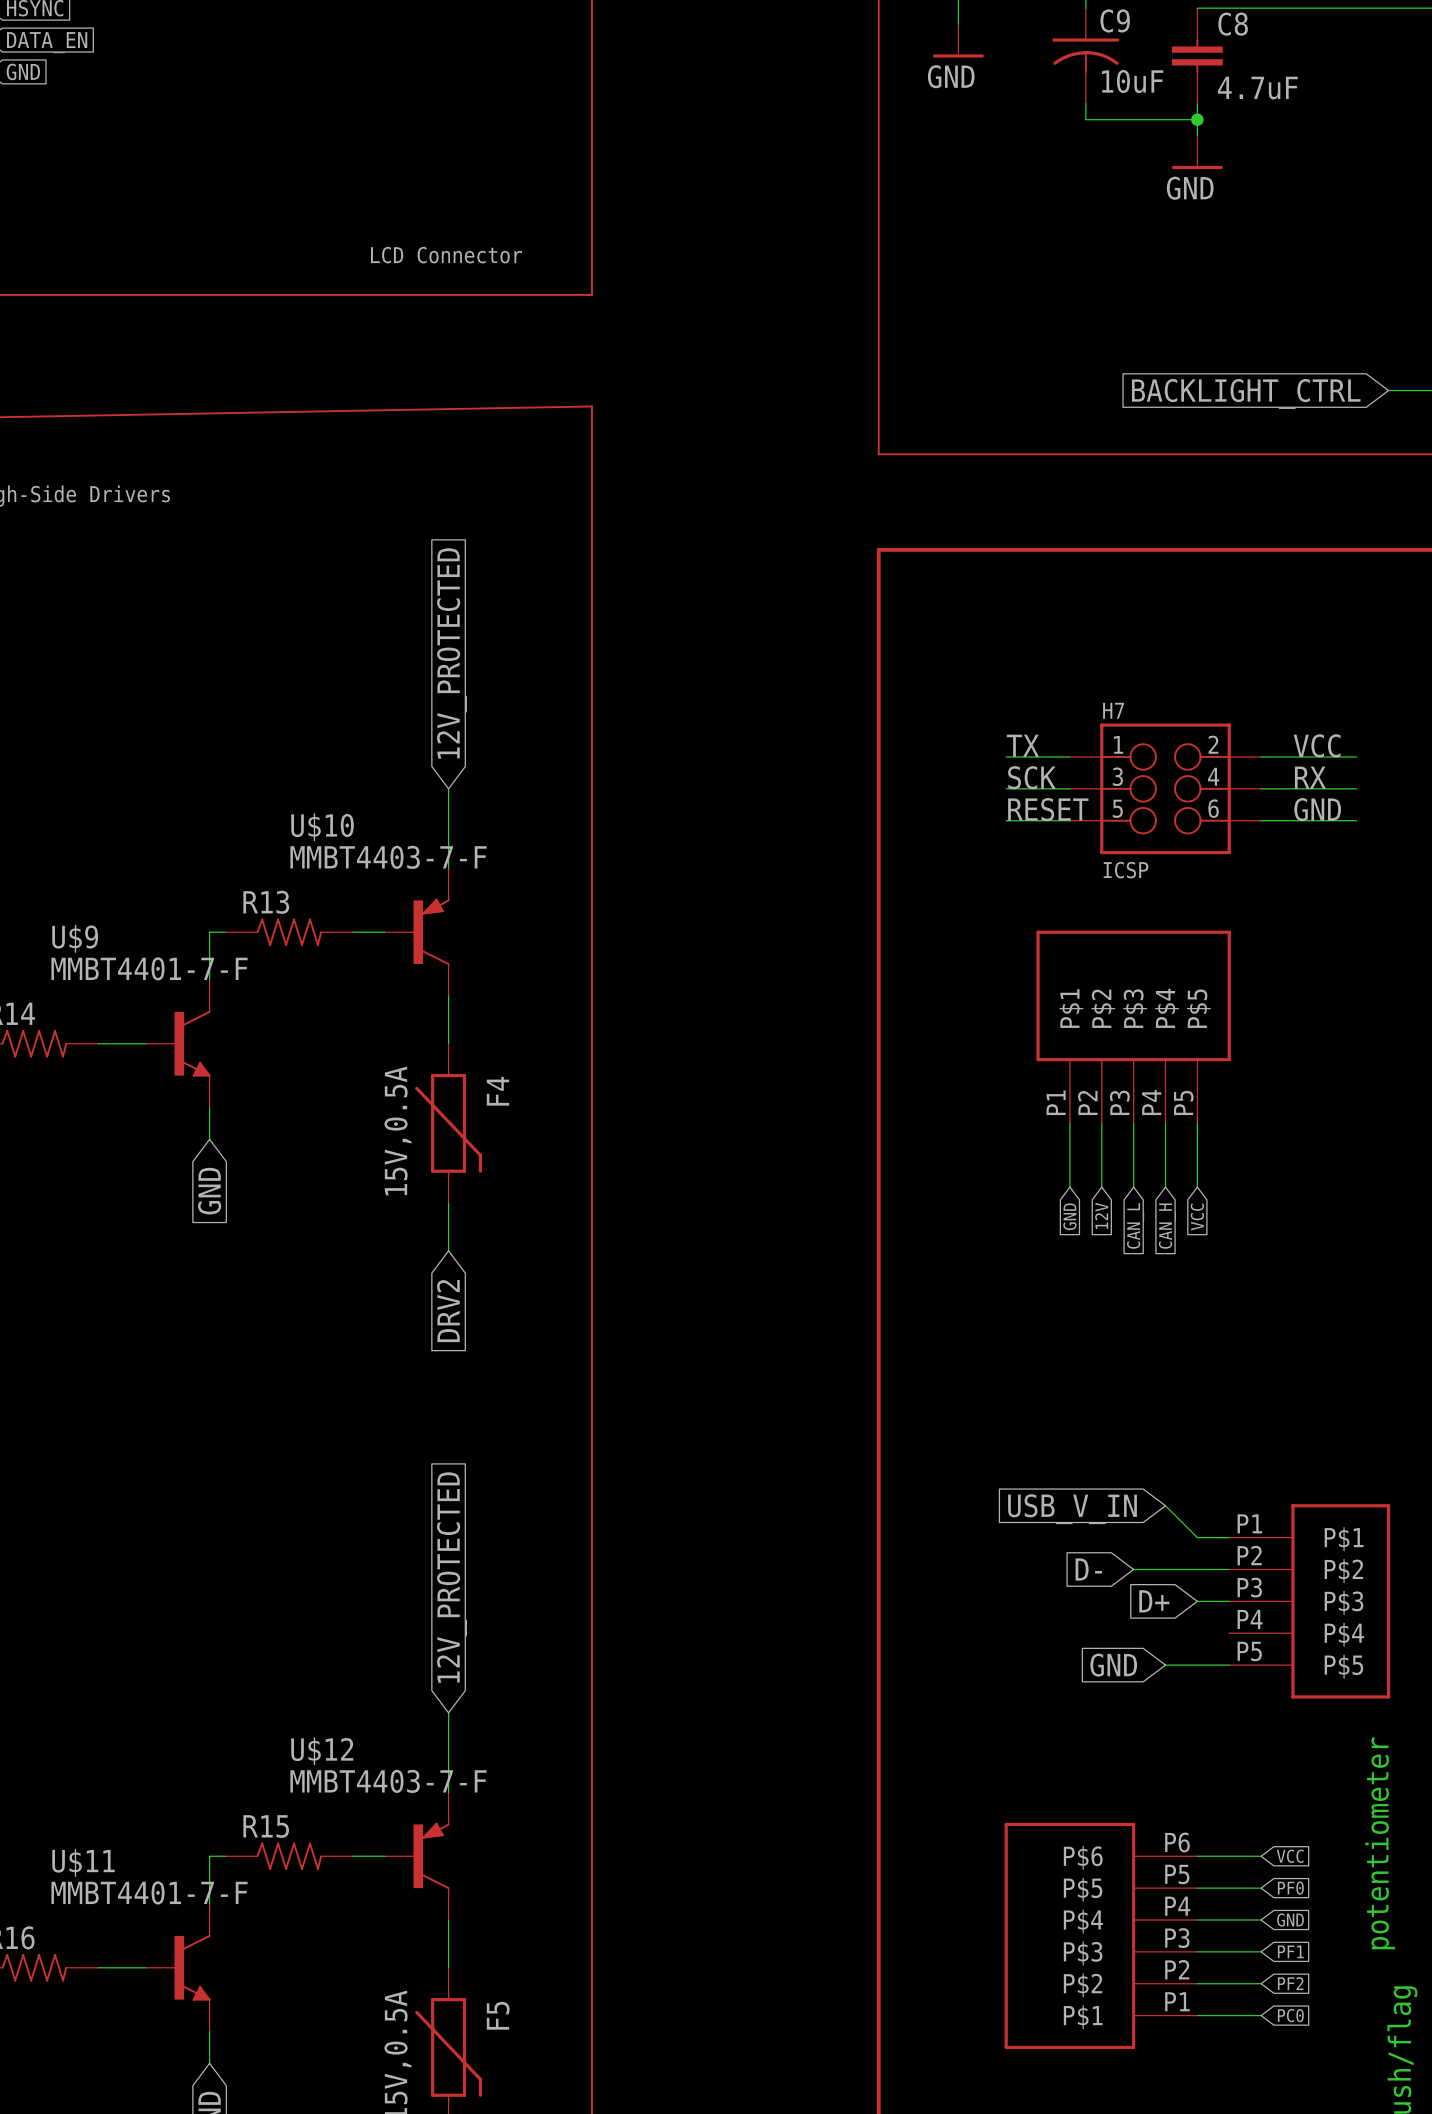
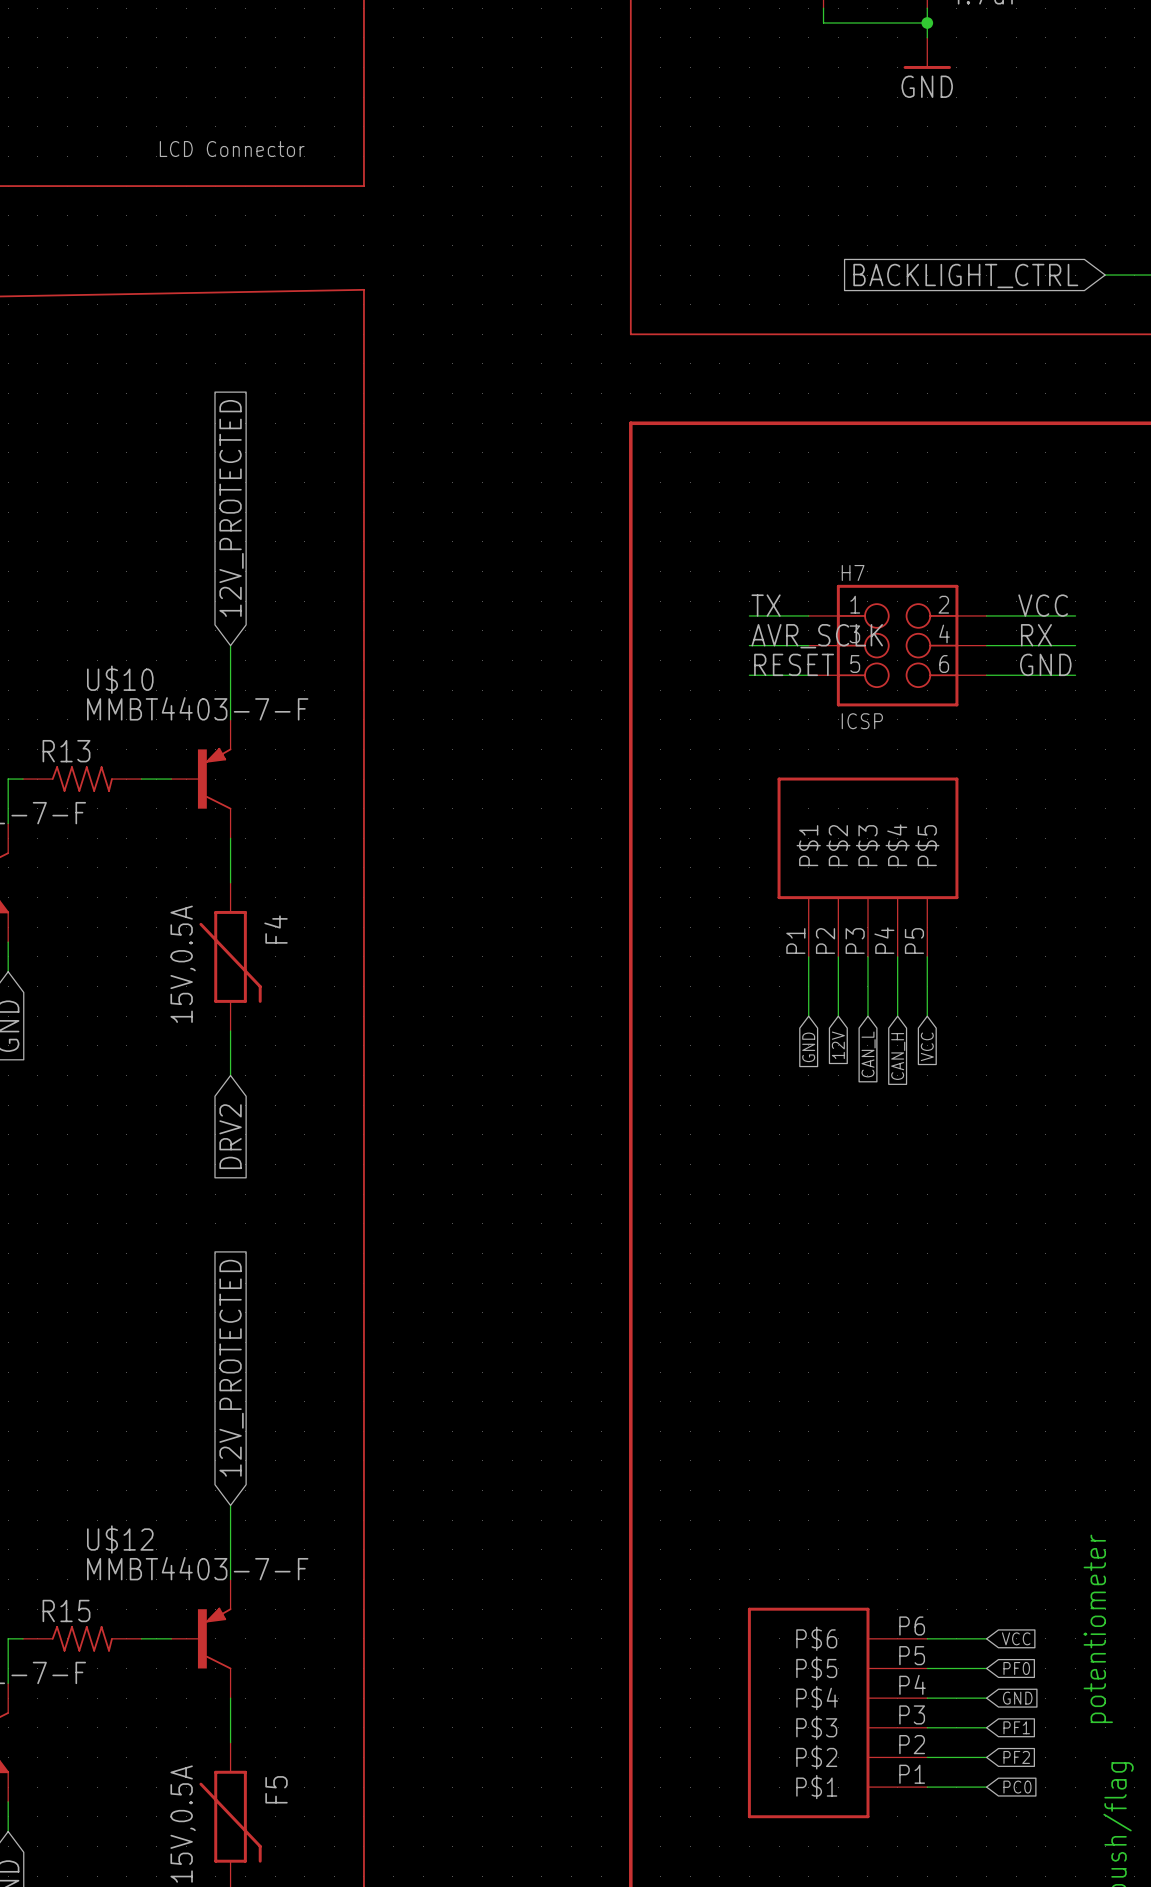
label: SCK (1031, 777) -> AVR_SCLK (817, 636)
wire: (1165, 1505) (1197, 1537) (1229, 1537) -> none
global label: USB_V_IN (1072, 1509) -> none
global label: D- (1088, 1569) -> none
wire: (1133, 1569) (1229, 1569) -> none
global label: D+ (1154, 1601) -> none
wire: (1197, 1601) (1229, 1601) -> none
part: (1309, 1601) -> none
global label: GND (1113, 1665) -> none
wire: (1165, 1665) (1229, 1665) -> none

